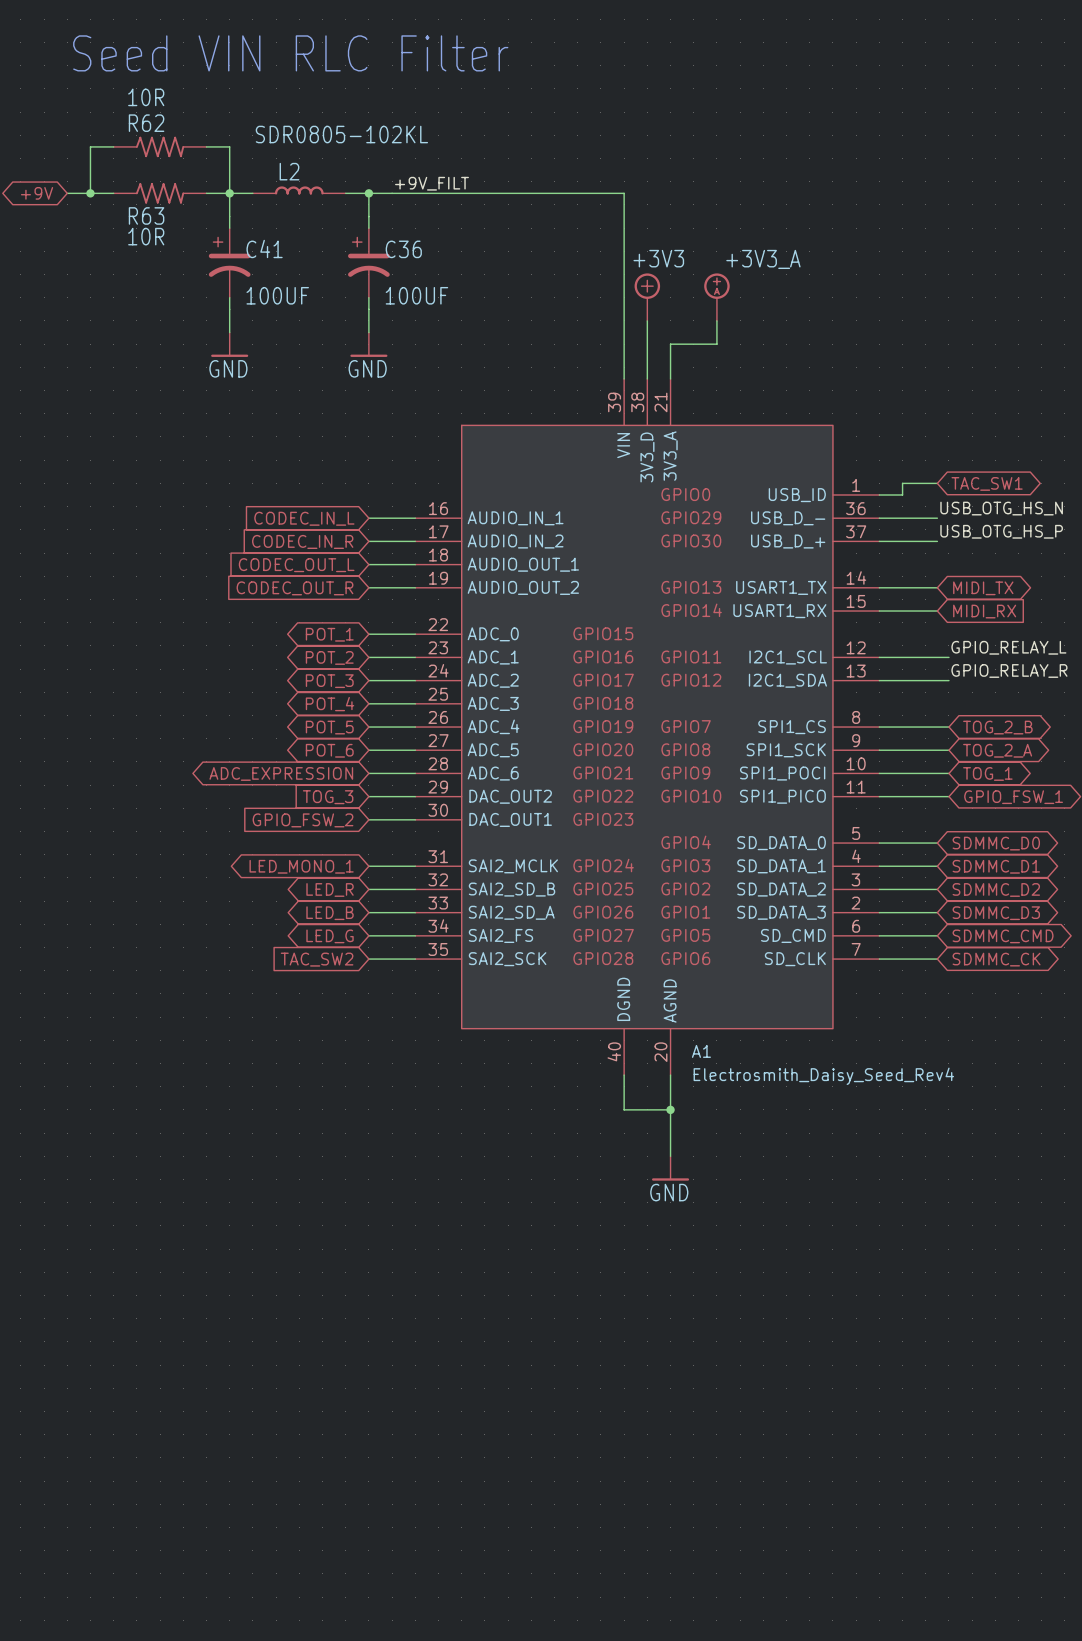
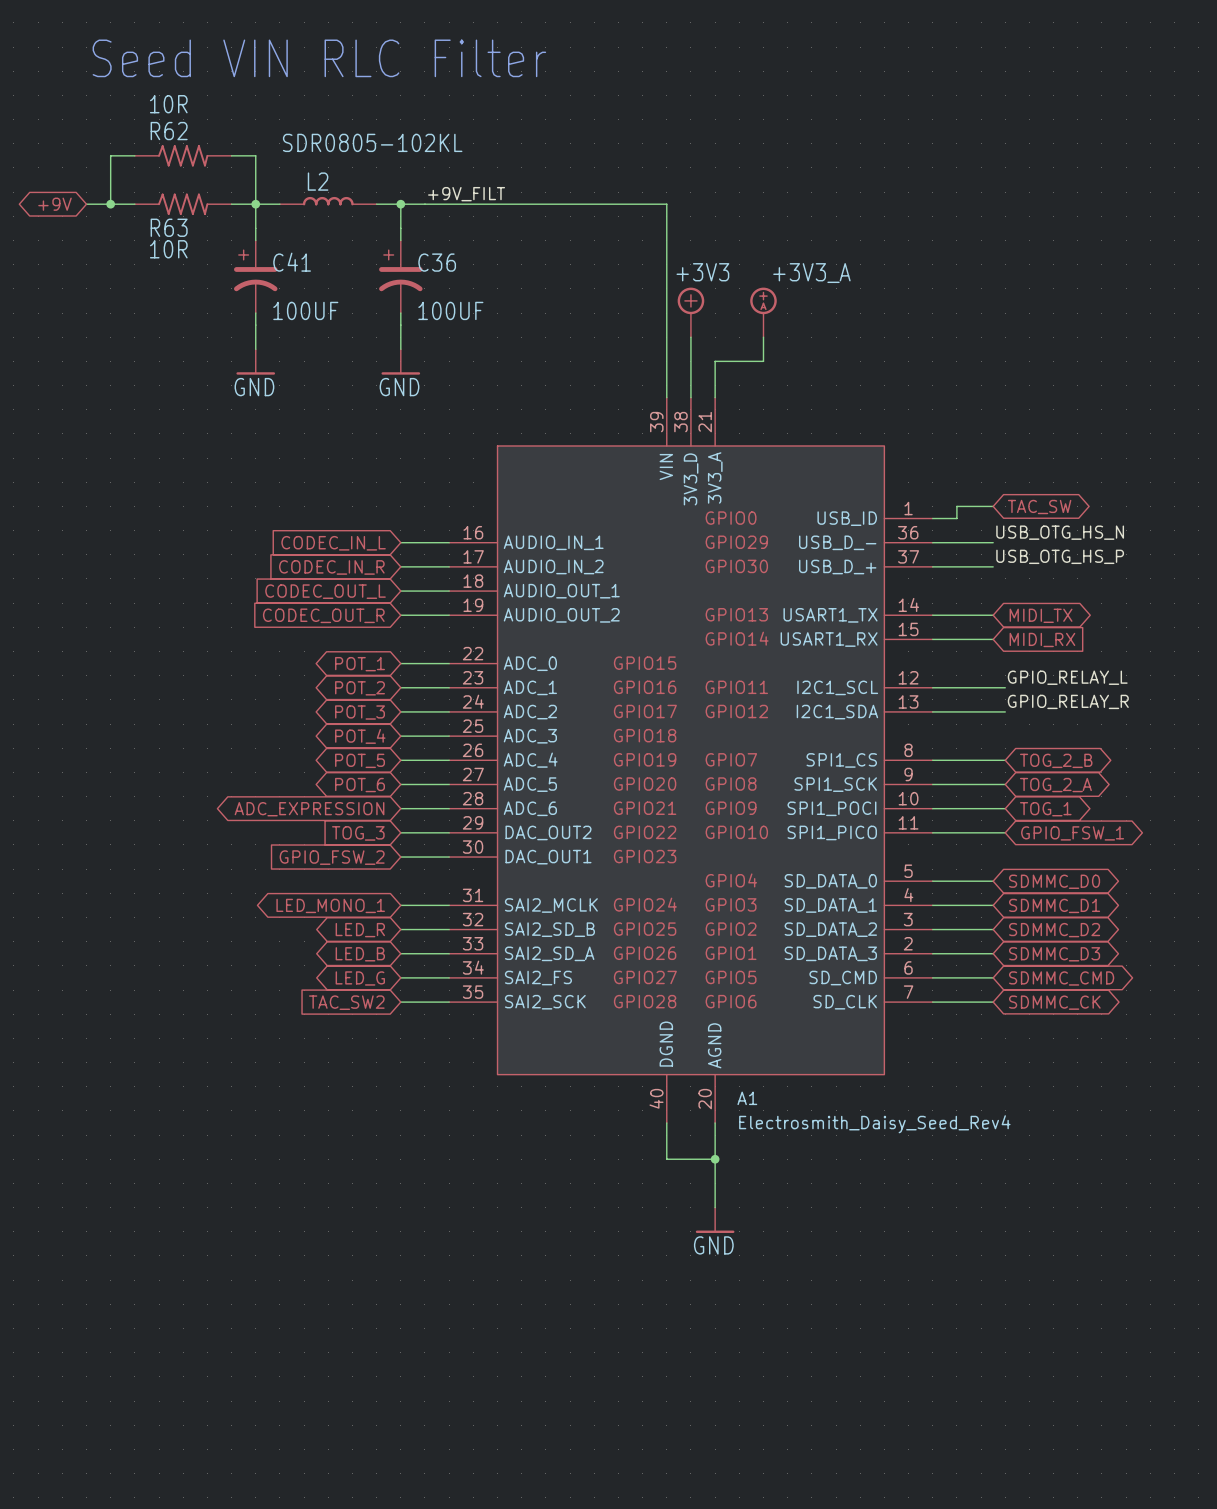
global label: TAC_SW1 (987, 483) -> TAC_SW (1039, 507)

